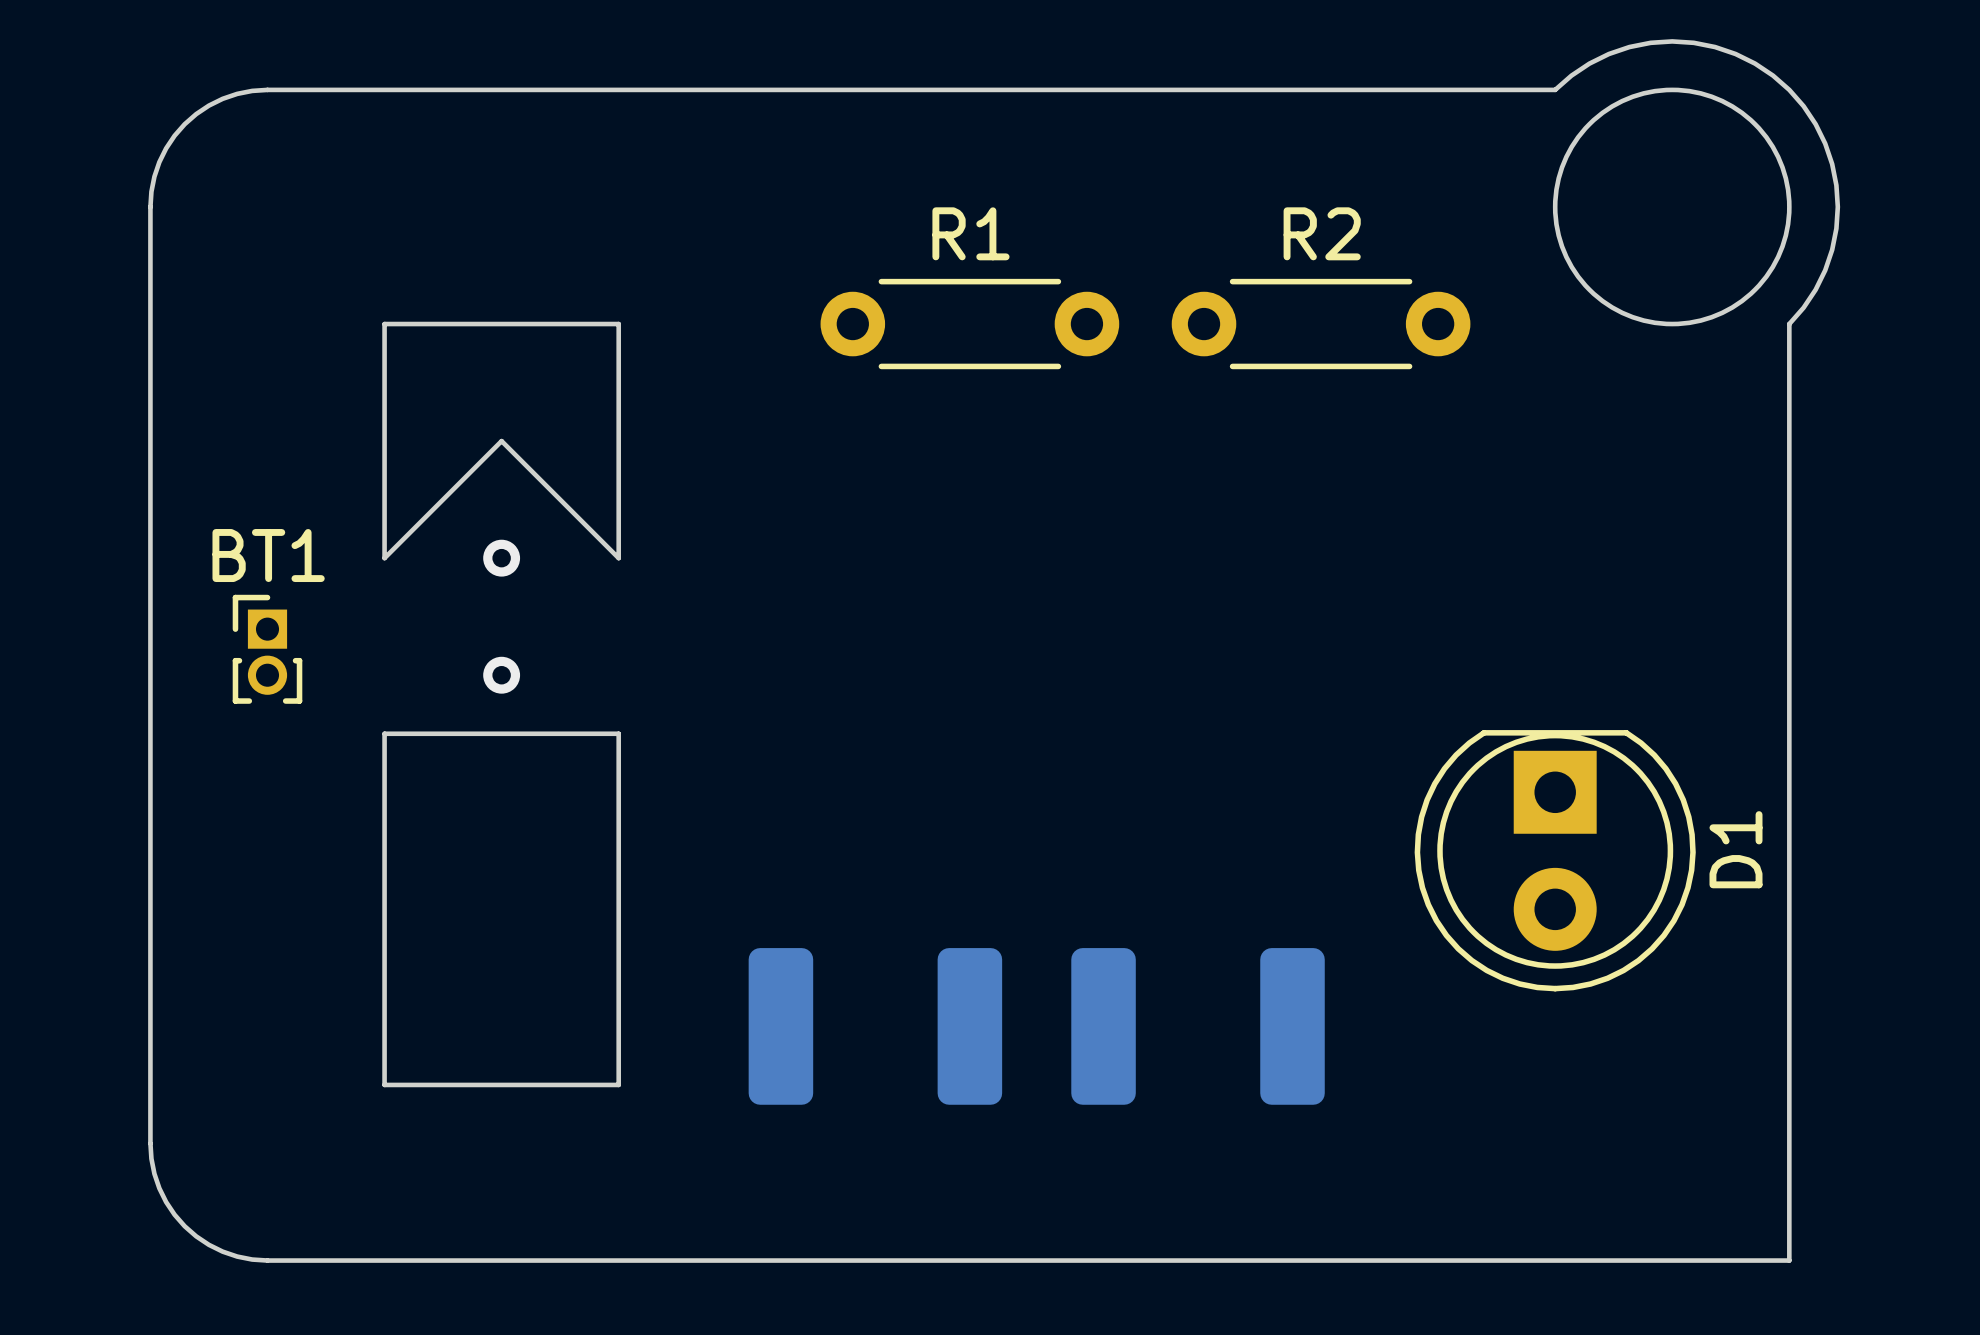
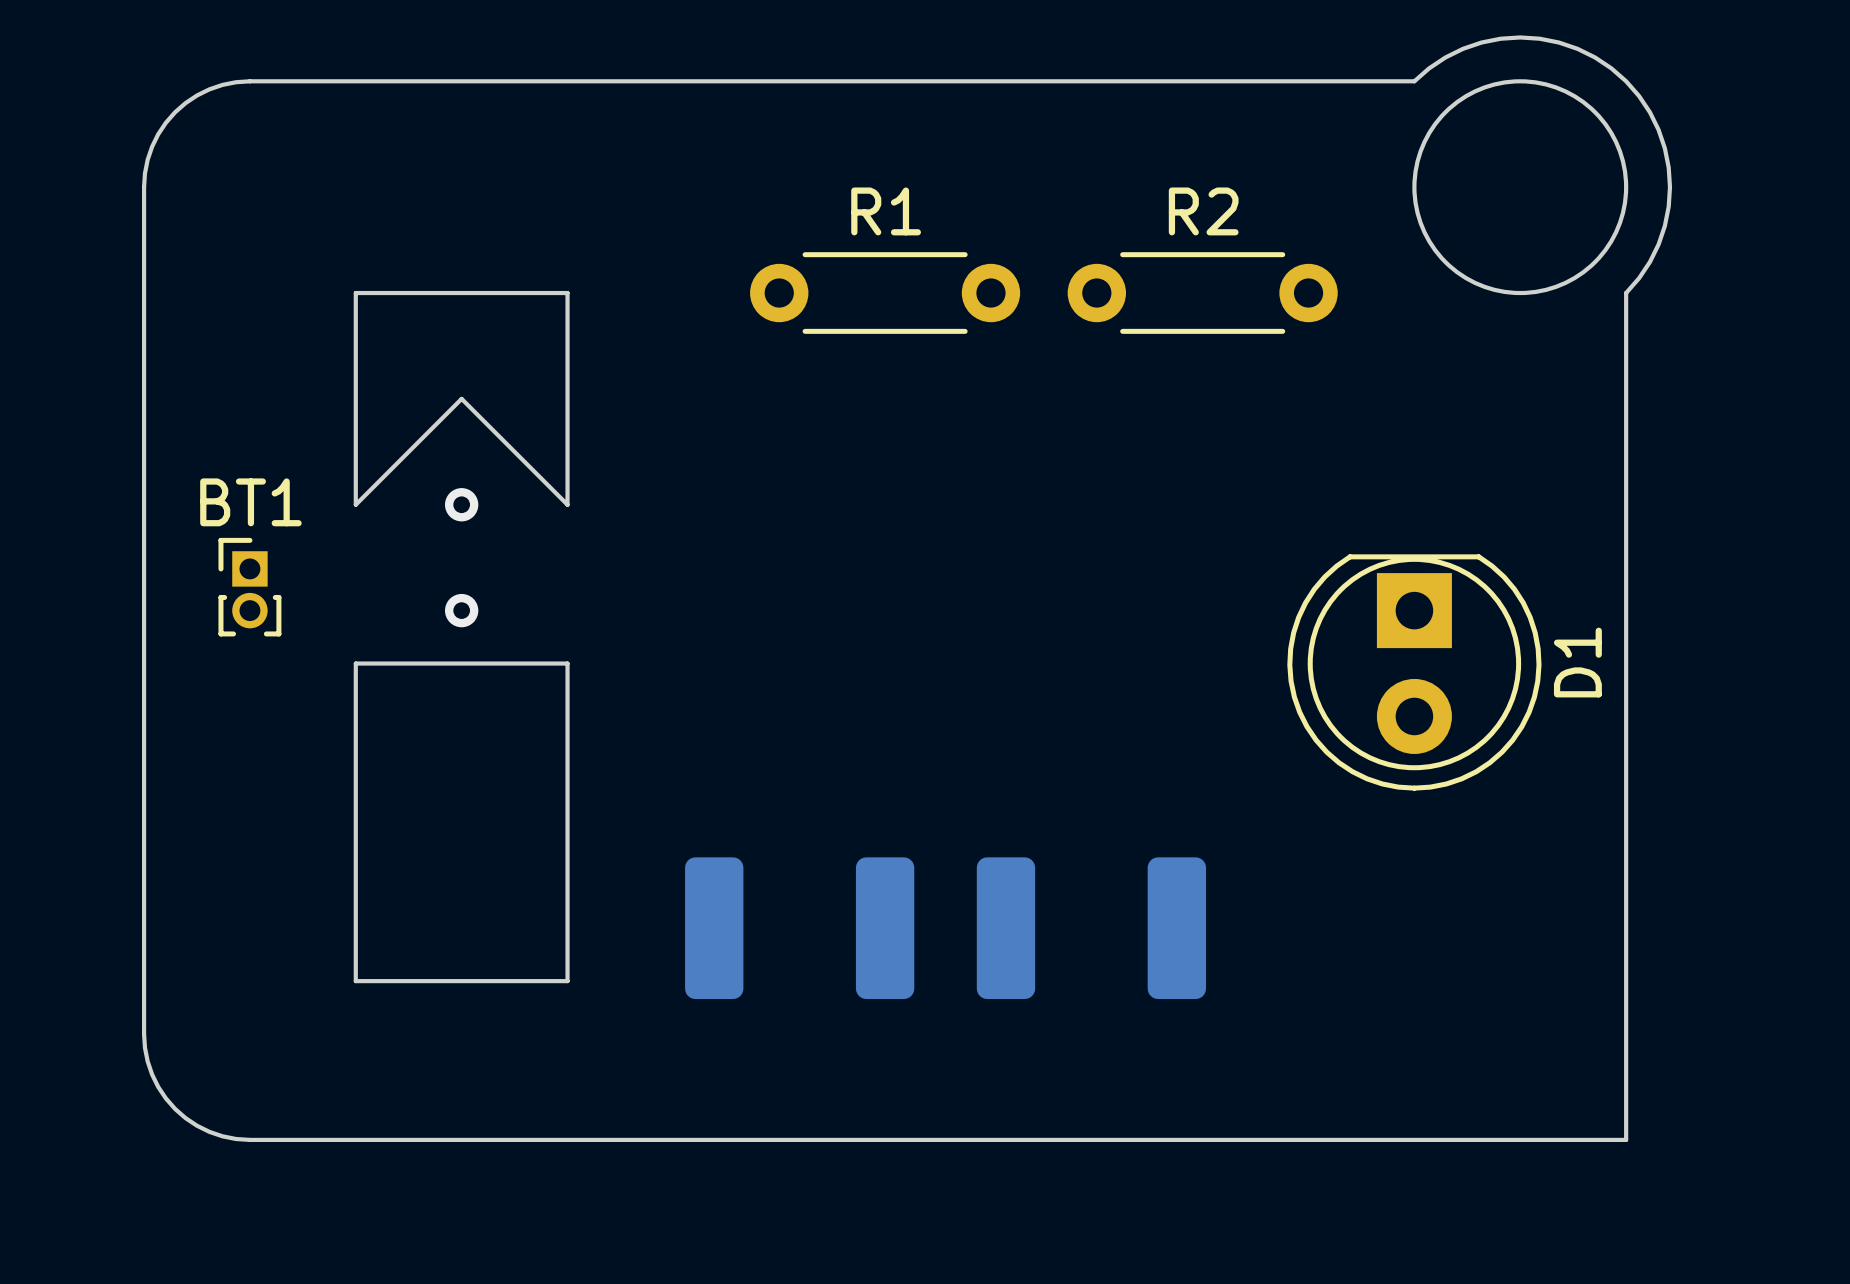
D1 position: (1555, 860) -> (1414, 672)

